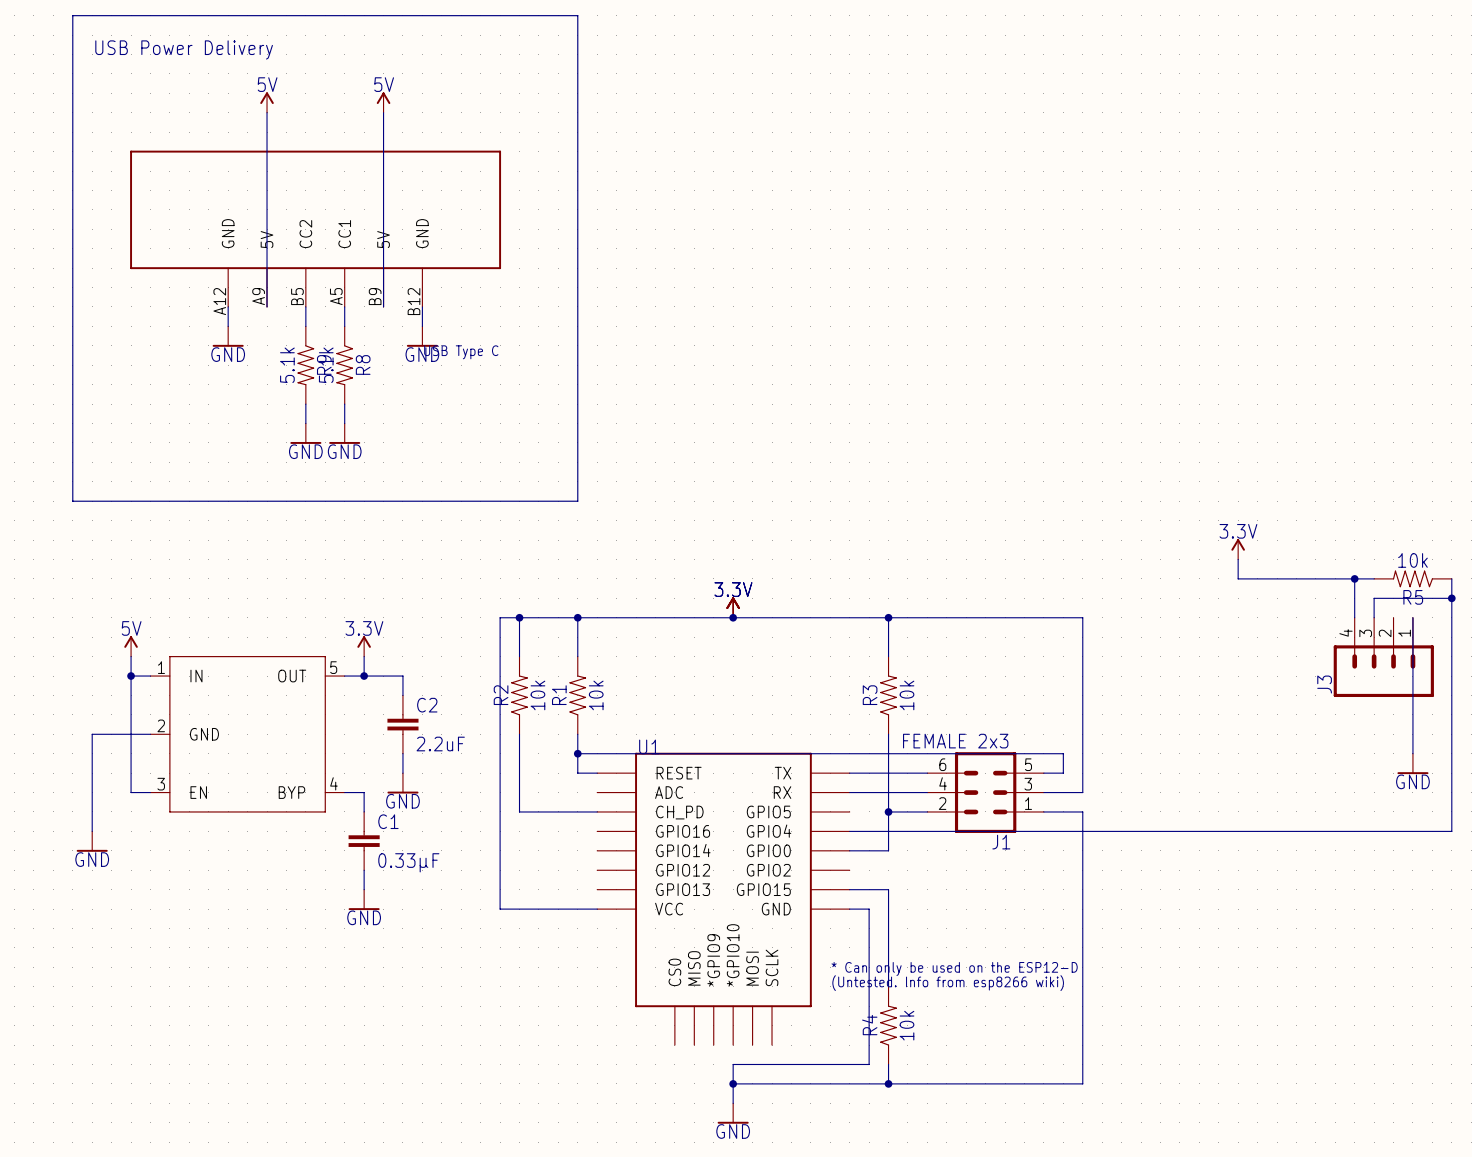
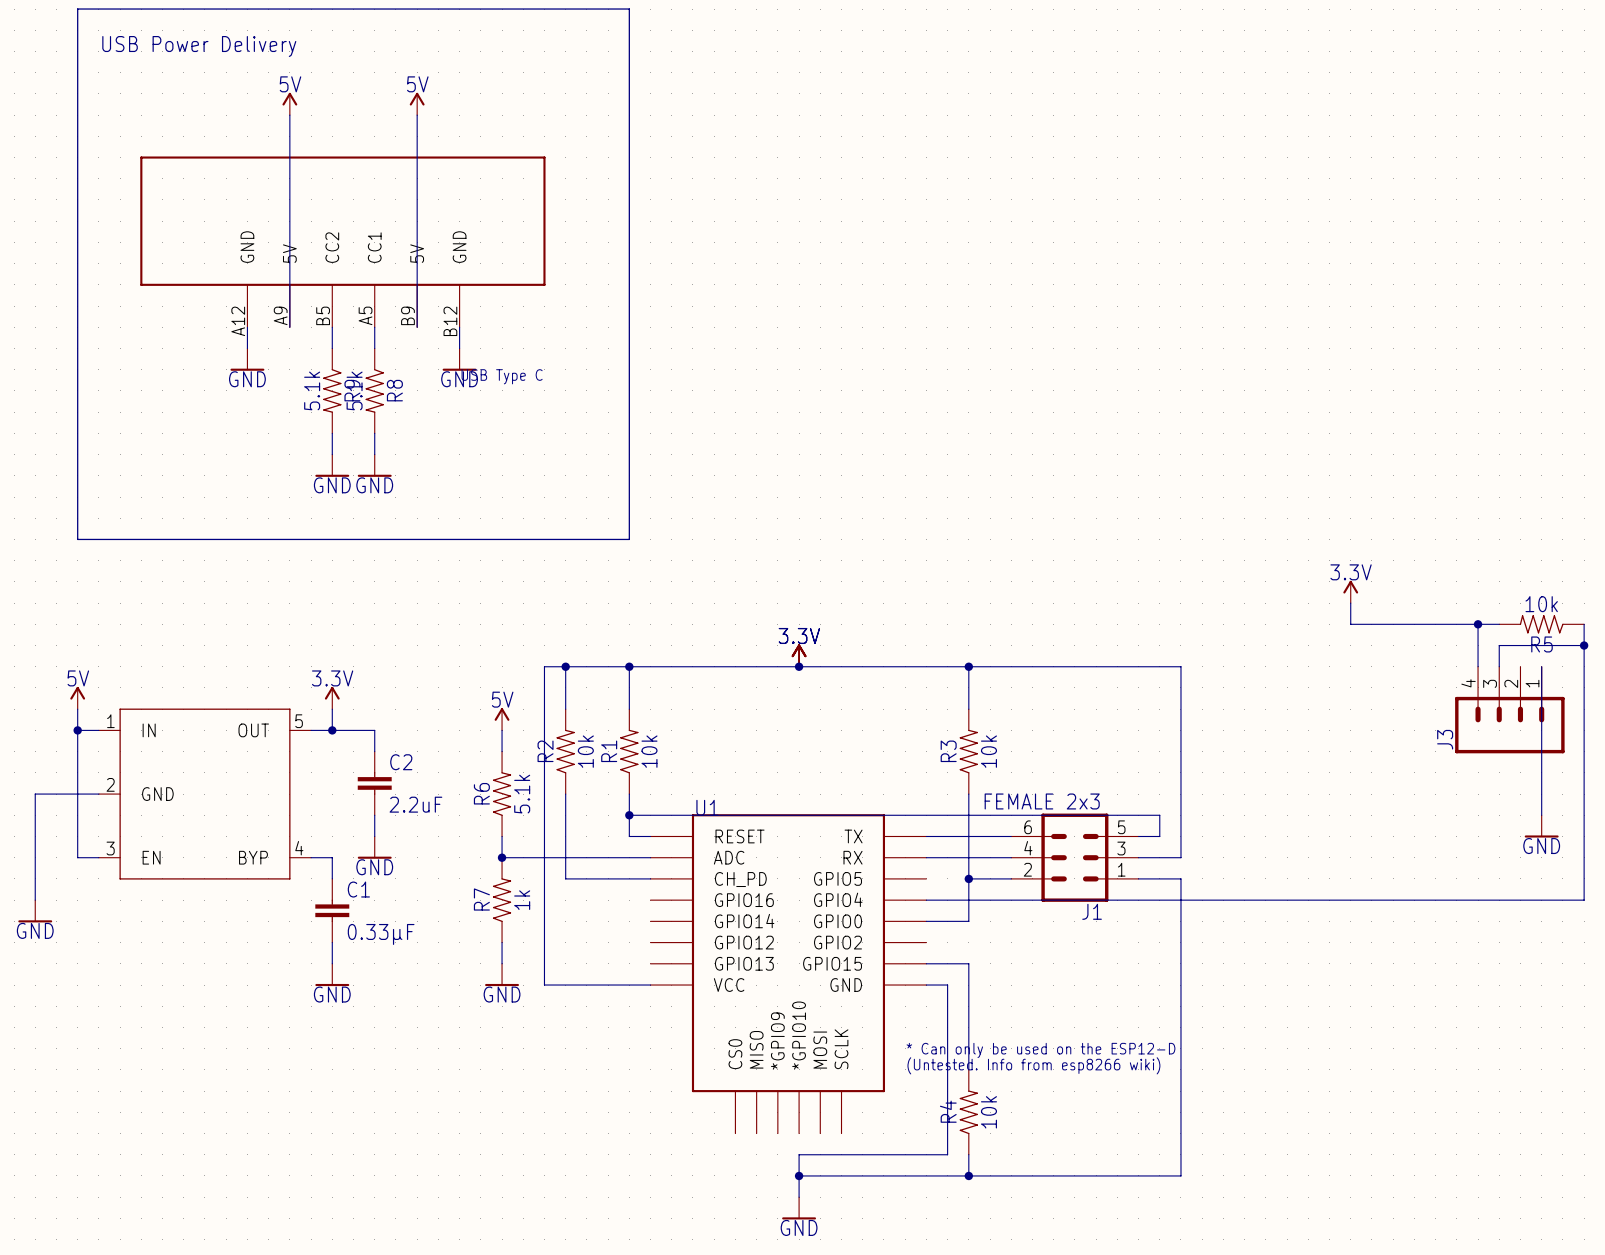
power symbol position: 5V (131, 646) -> 5V (77, 698)
power symbol position: 3.3V (364, 646) -> 3.3V (332, 698)
wire: (131, 656) (131, 792) (150, 792) -> (77, 709) (77, 857) (98, 857)
wire: (364, 656) (364, 676) -> (332, 709) (332, 730)
power symbol: none -> 5V (502, 719)
junction: none -> (77, 730)
wire: (131, 676) (150, 676) -> (77, 730) (98, 730)
junction: (131, 676) -> none
junction: none -> (332, 730)
wire: (344, 676) (402, 676) (402, 695) -> (311, 730) (374, 730) (374, 751)
junction: (364, 676) -> none
wire: none -> (502, 730) (502, 751)
C2 position: (402, 724) -> (374, 783)
wire: (150, 734) (92, 734) (92, 831) -> (98, 794) (35, 794) (35, 900)
part position: (247, 734) -> (204, 794)
R6: none -> 5.1k (502, 794)
wire: (402, 753) (402, 773) -> (374, 815) (374, 836)
wire: none -> (502, 836) (502, 857) (650, 857)
power symbol position: GND (402, 783) -> GND (374, 847)
wire: (344, 792) (364, 792) (364, 811) -> (311, 857) (332, 857) (332, 878)
junction: none -> (502, 857)
R7: none -> 1k (502, 900)
power symbol position: GND (92, 841) -> GND (35, 911)
C1 position: (364, 841) -> (332, 910)
wire: (364, 870) (364, 889) -> (332, 942) (332, 963)
wire: none -> (502, 942) (502, 963)
power symbol: none -> GND (332, 974)
power symbol: GND (364, 899) -> none
power symbol: none -> GND (502, 974)

